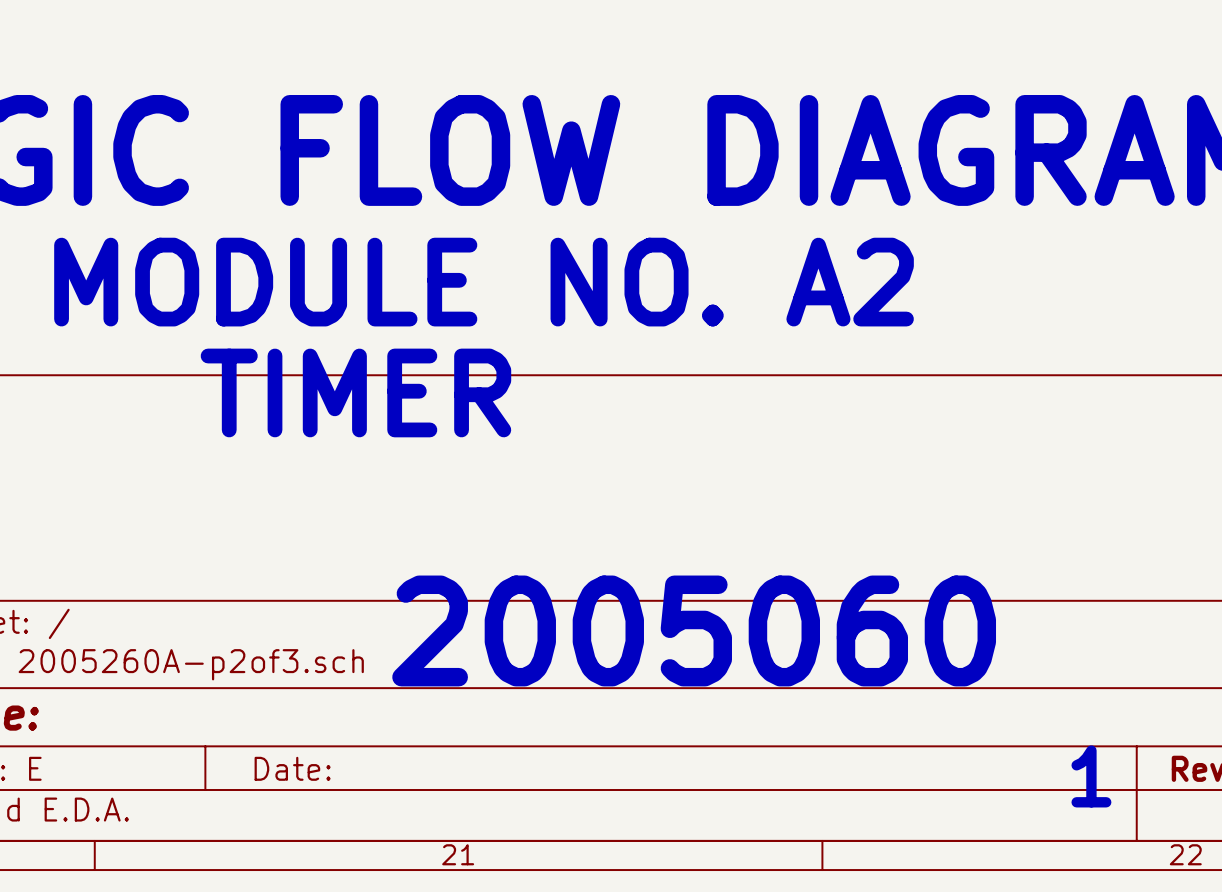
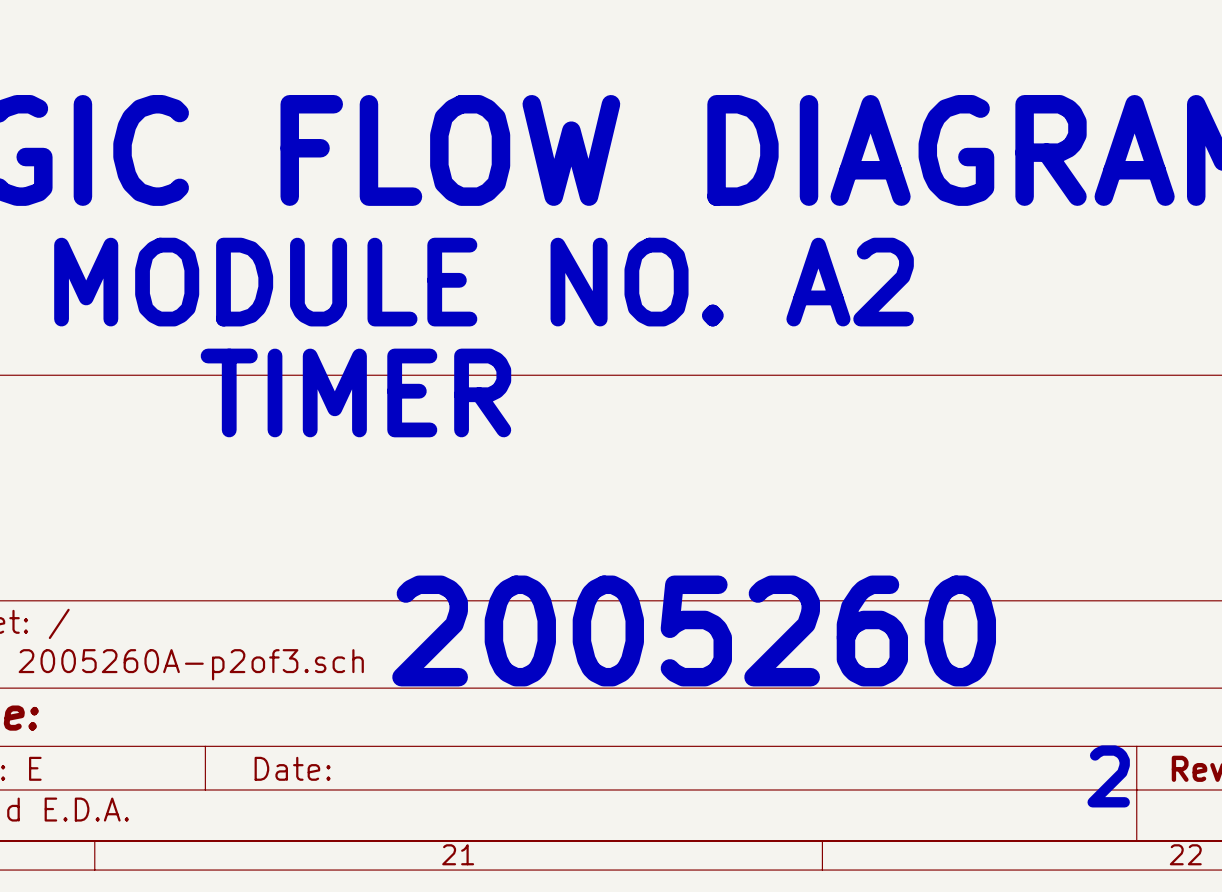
text: 2005060 (694, 630) -> 2005260 (694, 630)
text: 1 (1091, 776) -> none
text: none -> 2 (1108, 776)

